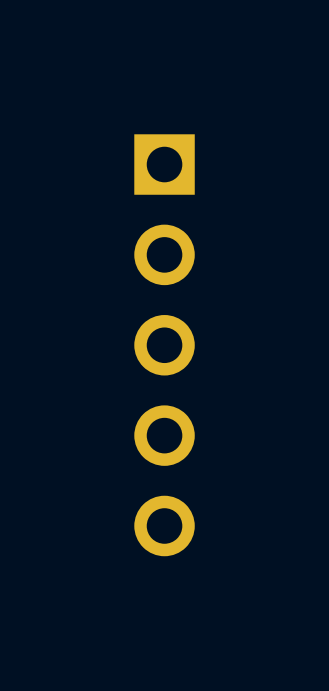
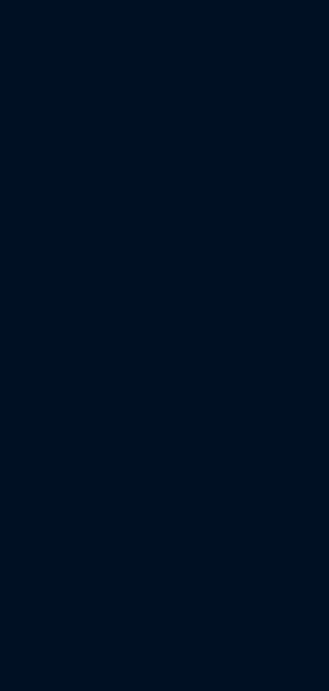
part: (164, 345) -> none

